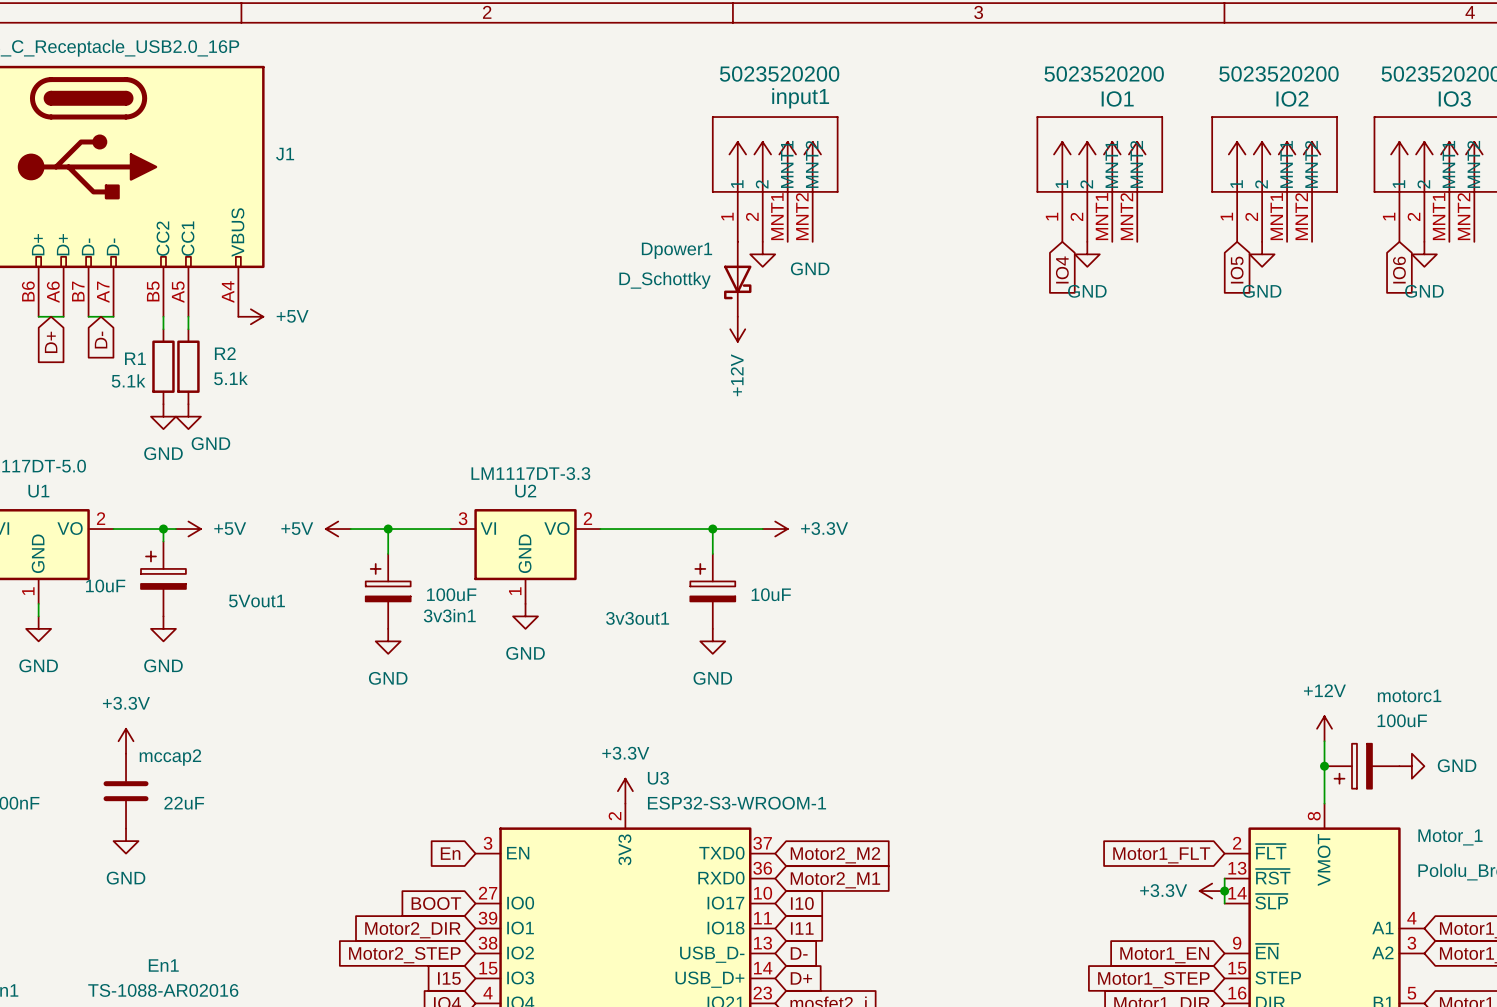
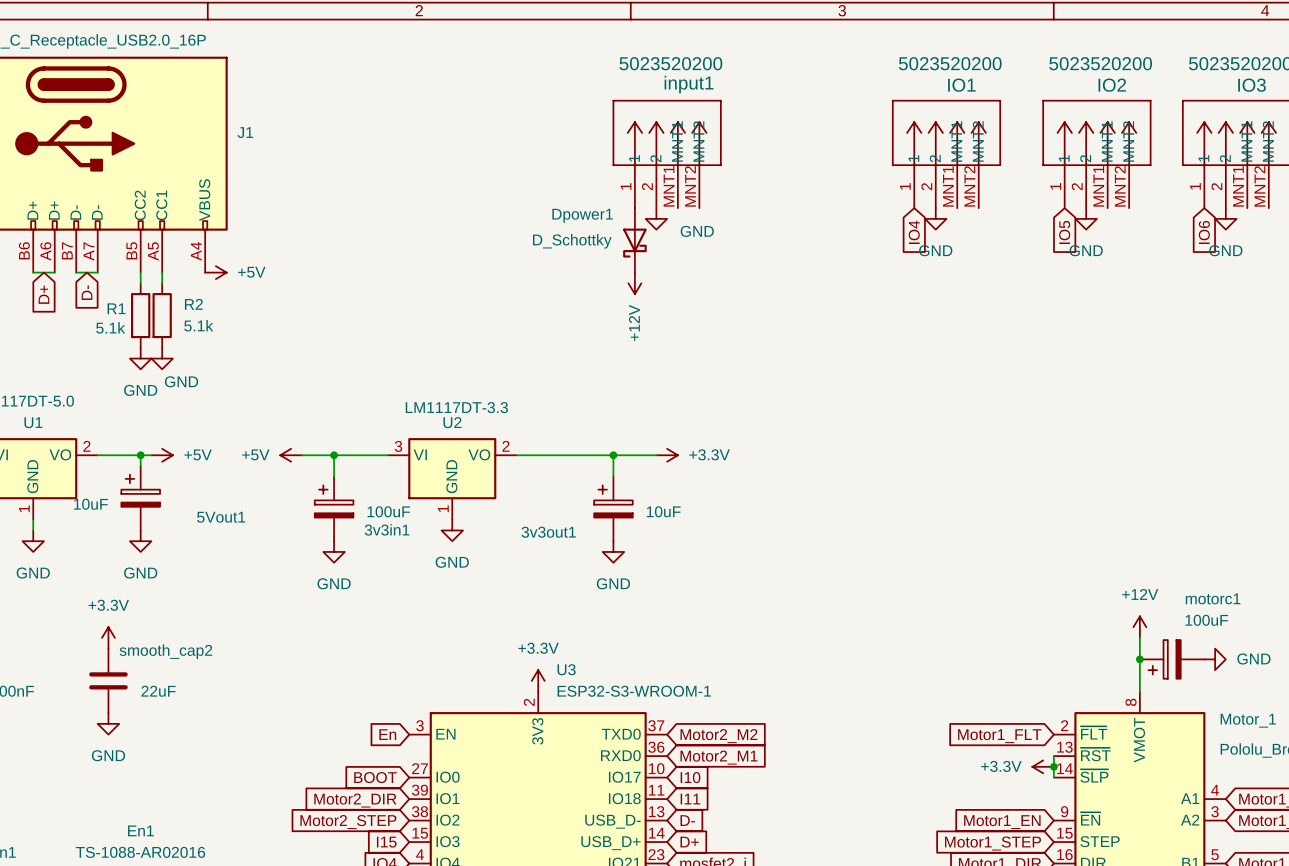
mccap2 name: mccap2 (170, 757) -> smooth_cap2 (165, 651)

